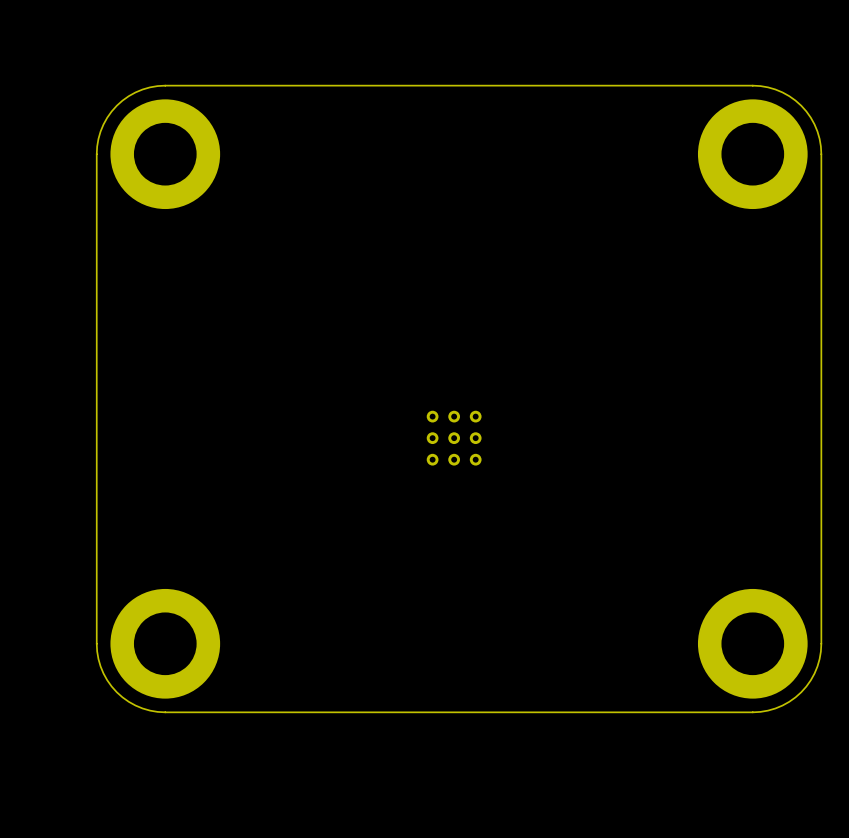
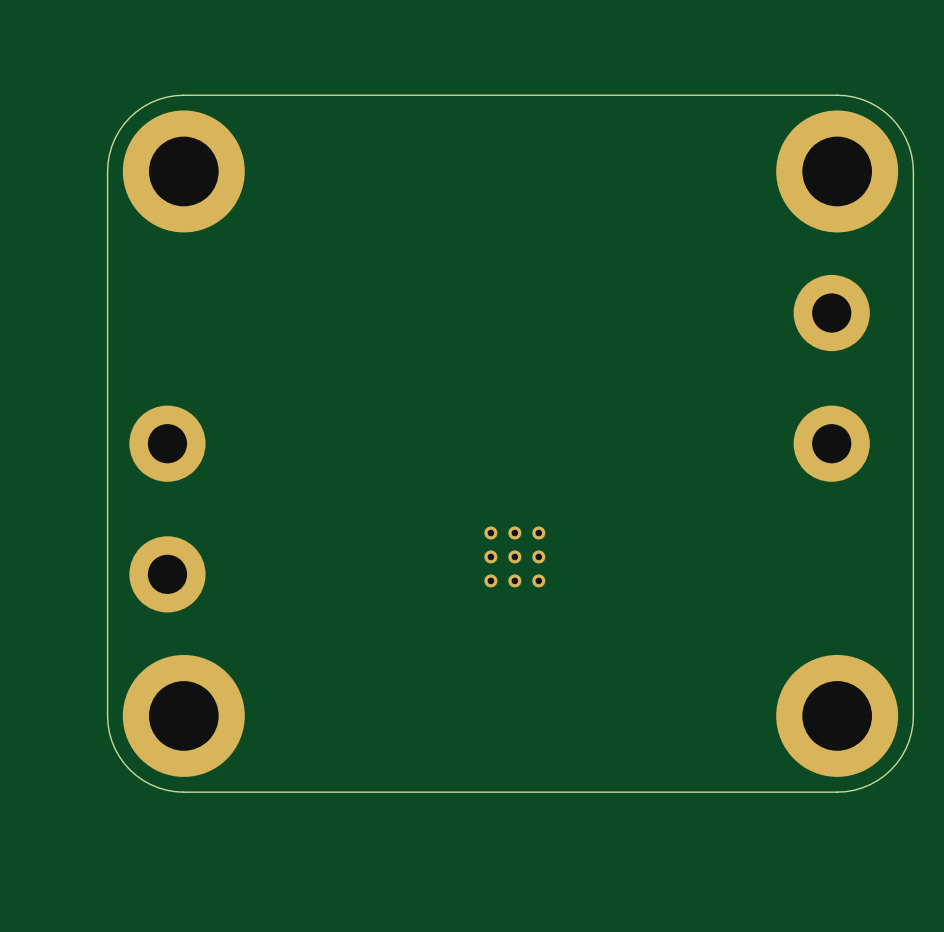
part: none -> (831, 313)
part: none -> (167, 443)
part: none -> (831, 443)
part position: (454, 438) -> (514, 556)
part: none -> (167, 574)

